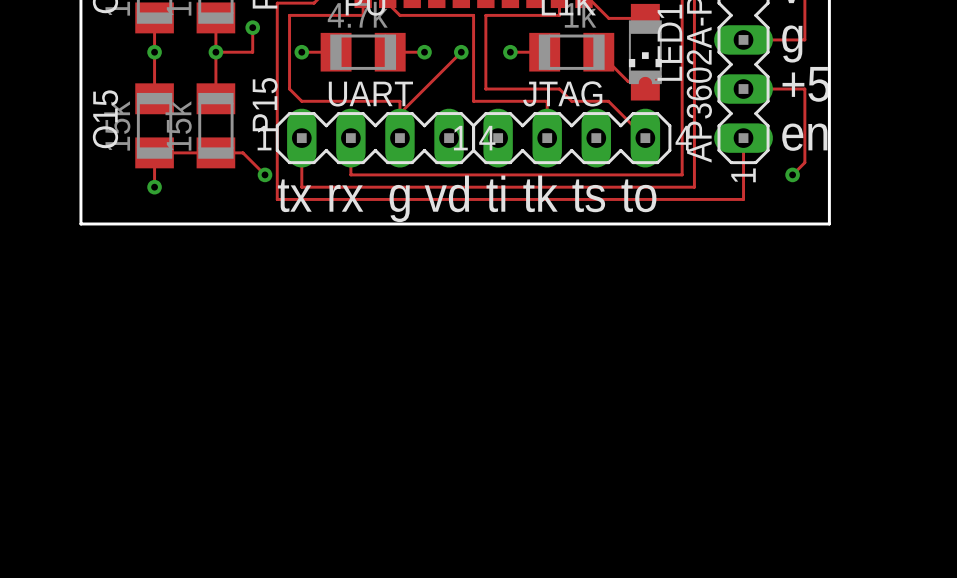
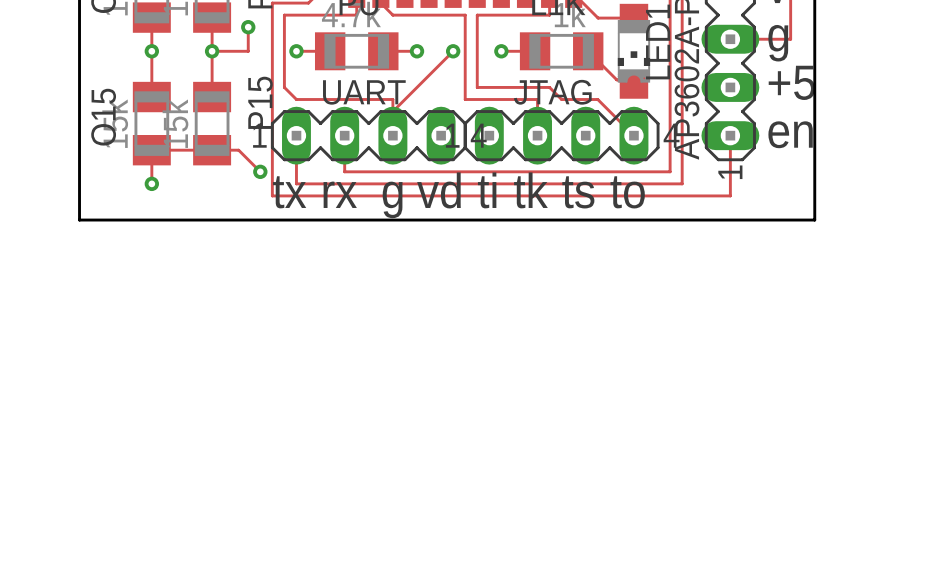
track: (743, 89) (804, 89) (804, 162) (792, 174) -> none
via: (792, 174) -> none

